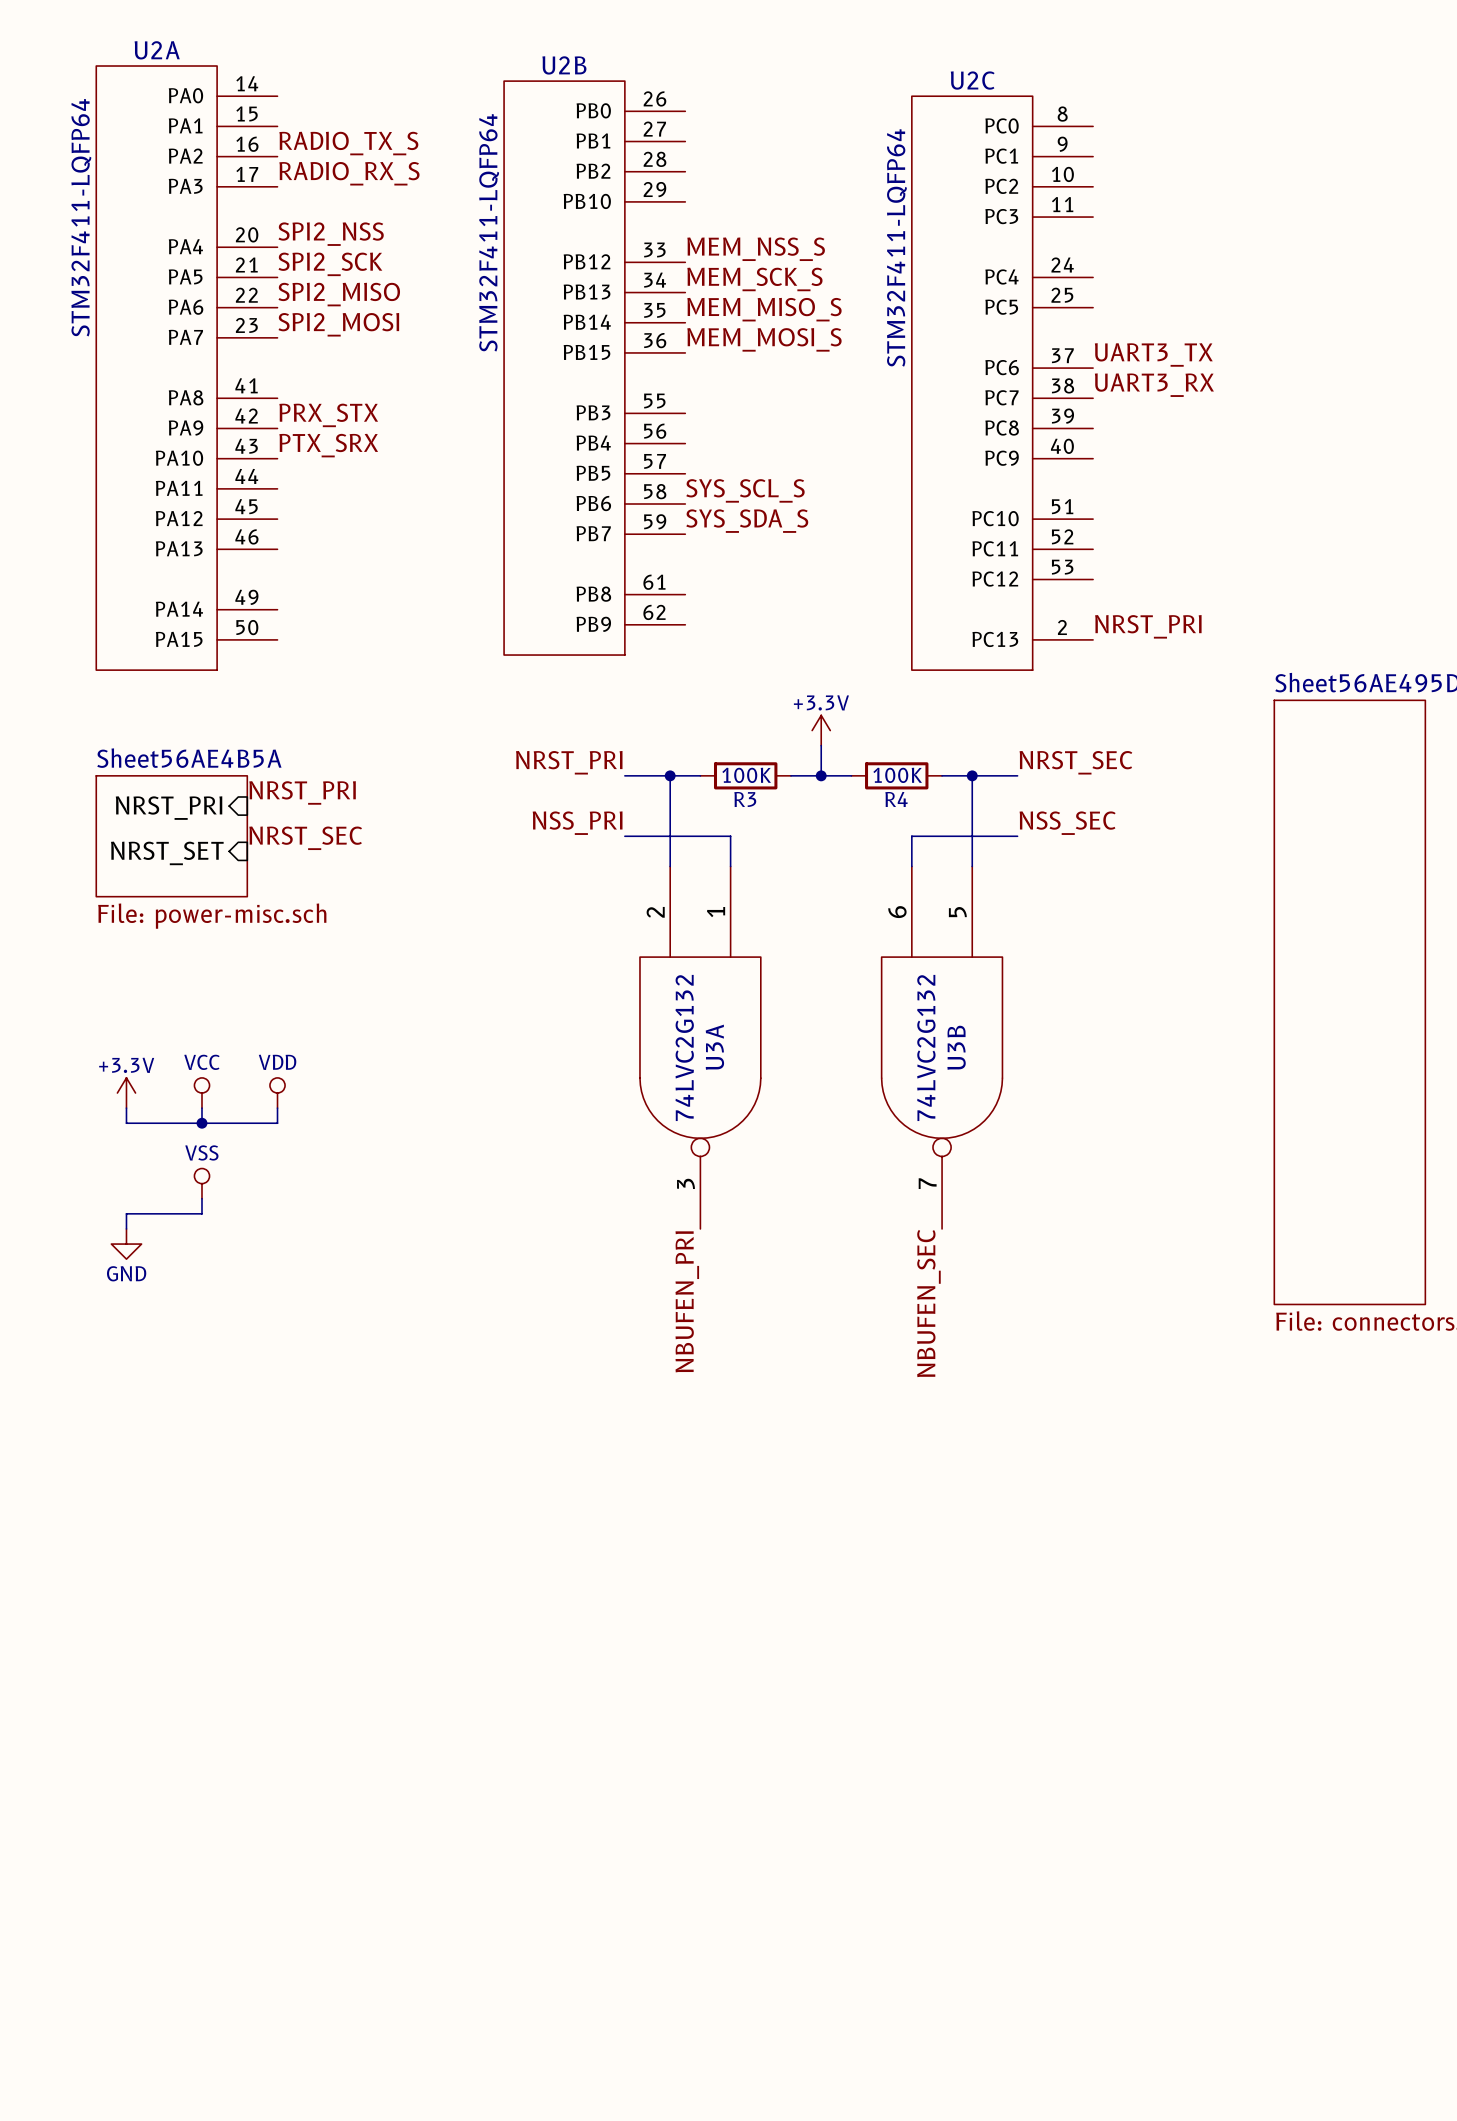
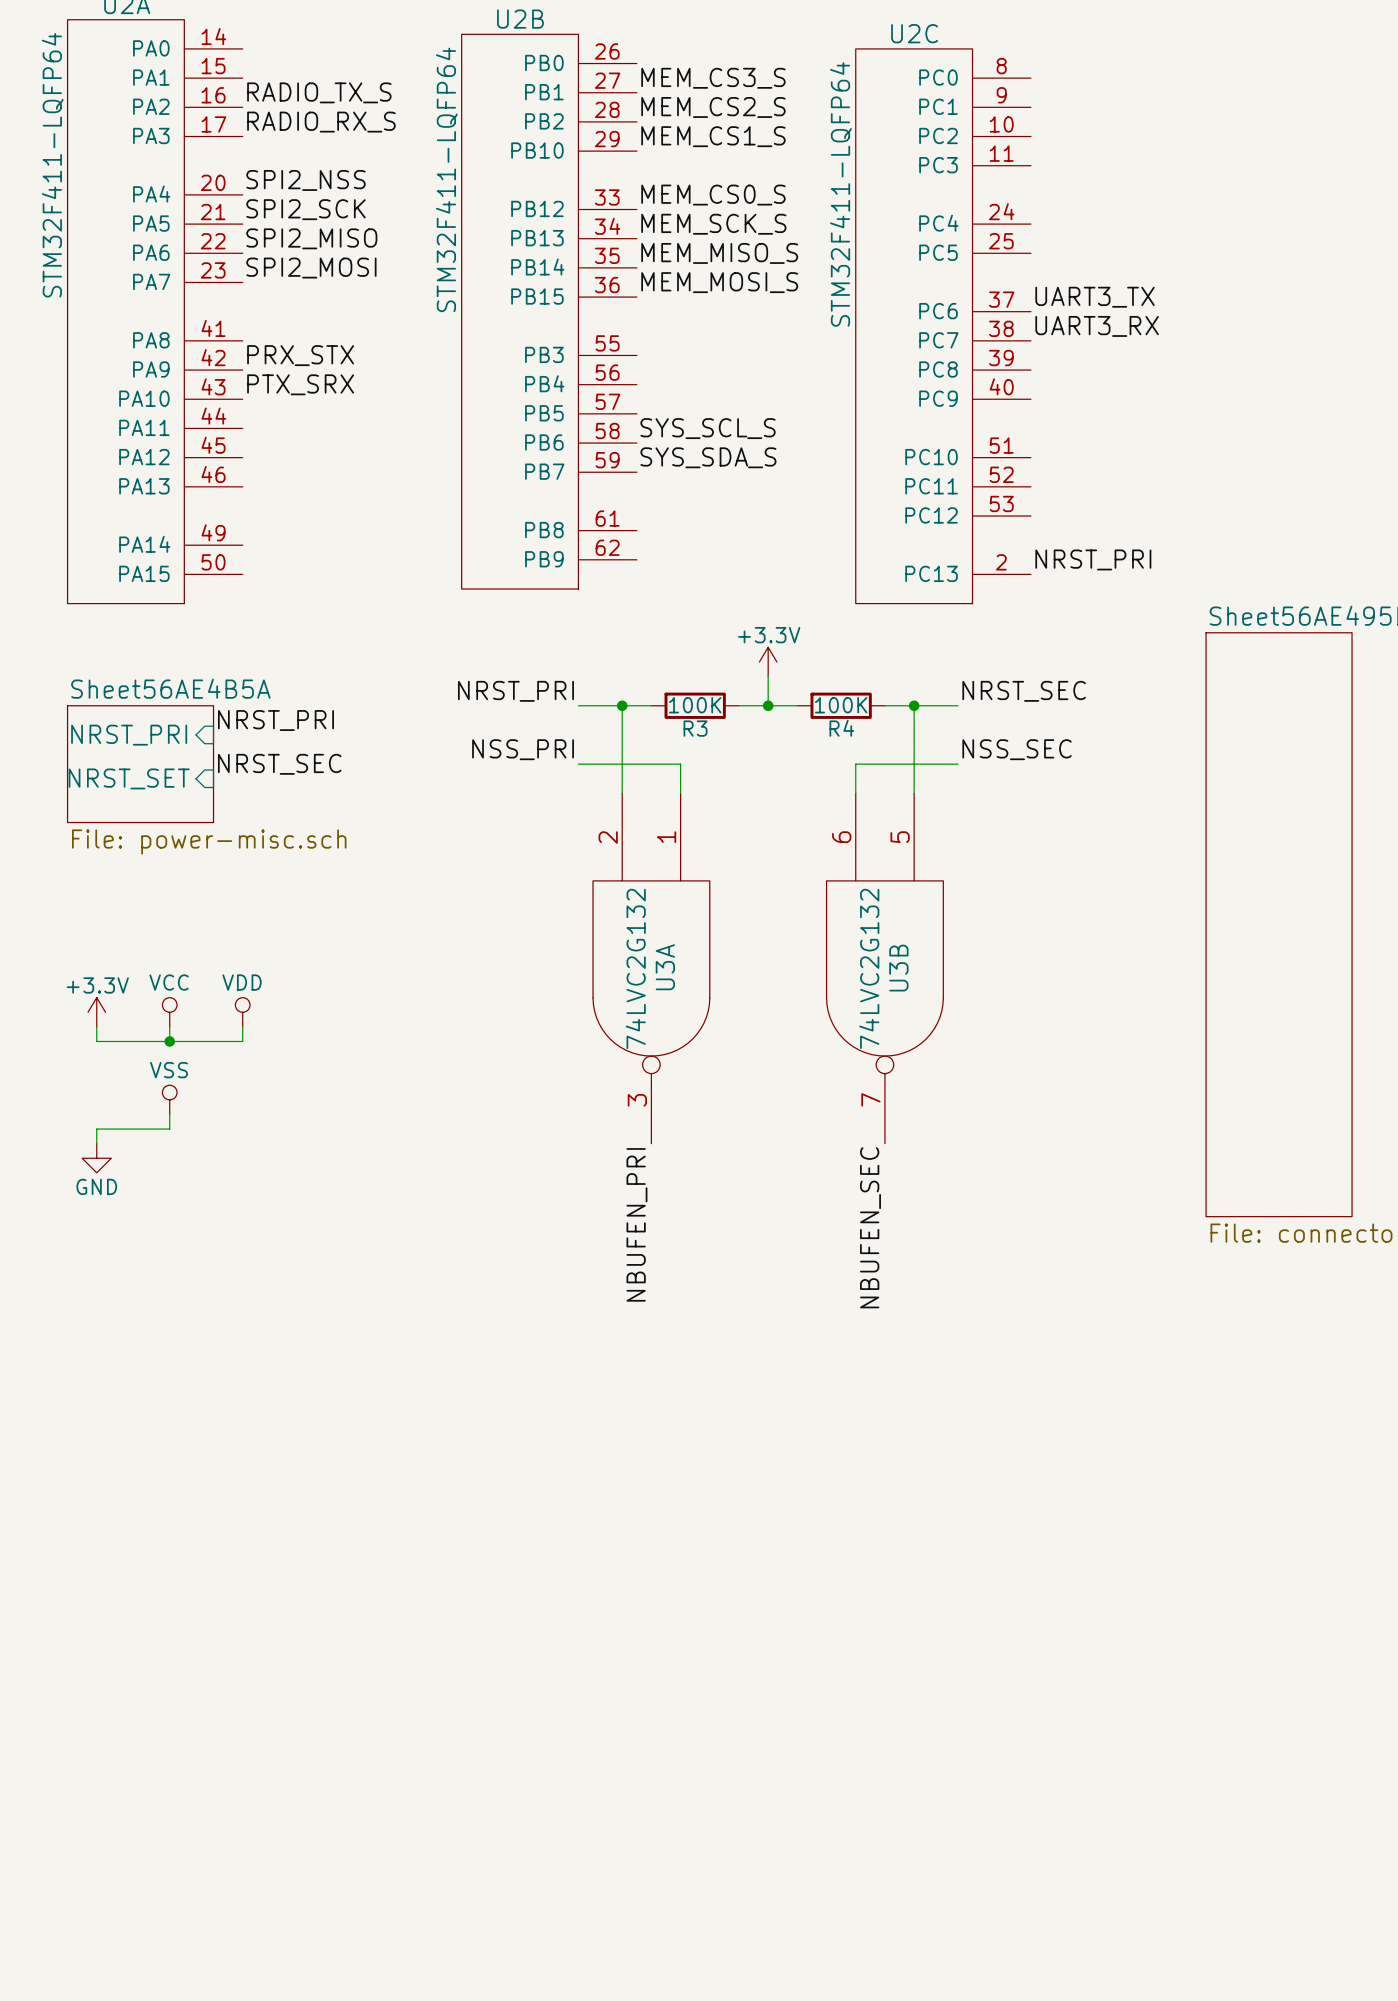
label: none -> MEM_CS3_S (713, 78)
label: none -> MEM_CS2_S (713, 107)
label: none -> MEM_CS1_S (713, 136)
label: MEM_NSS_S (756, 249) -> MEM_CS0_S (713, 195)

